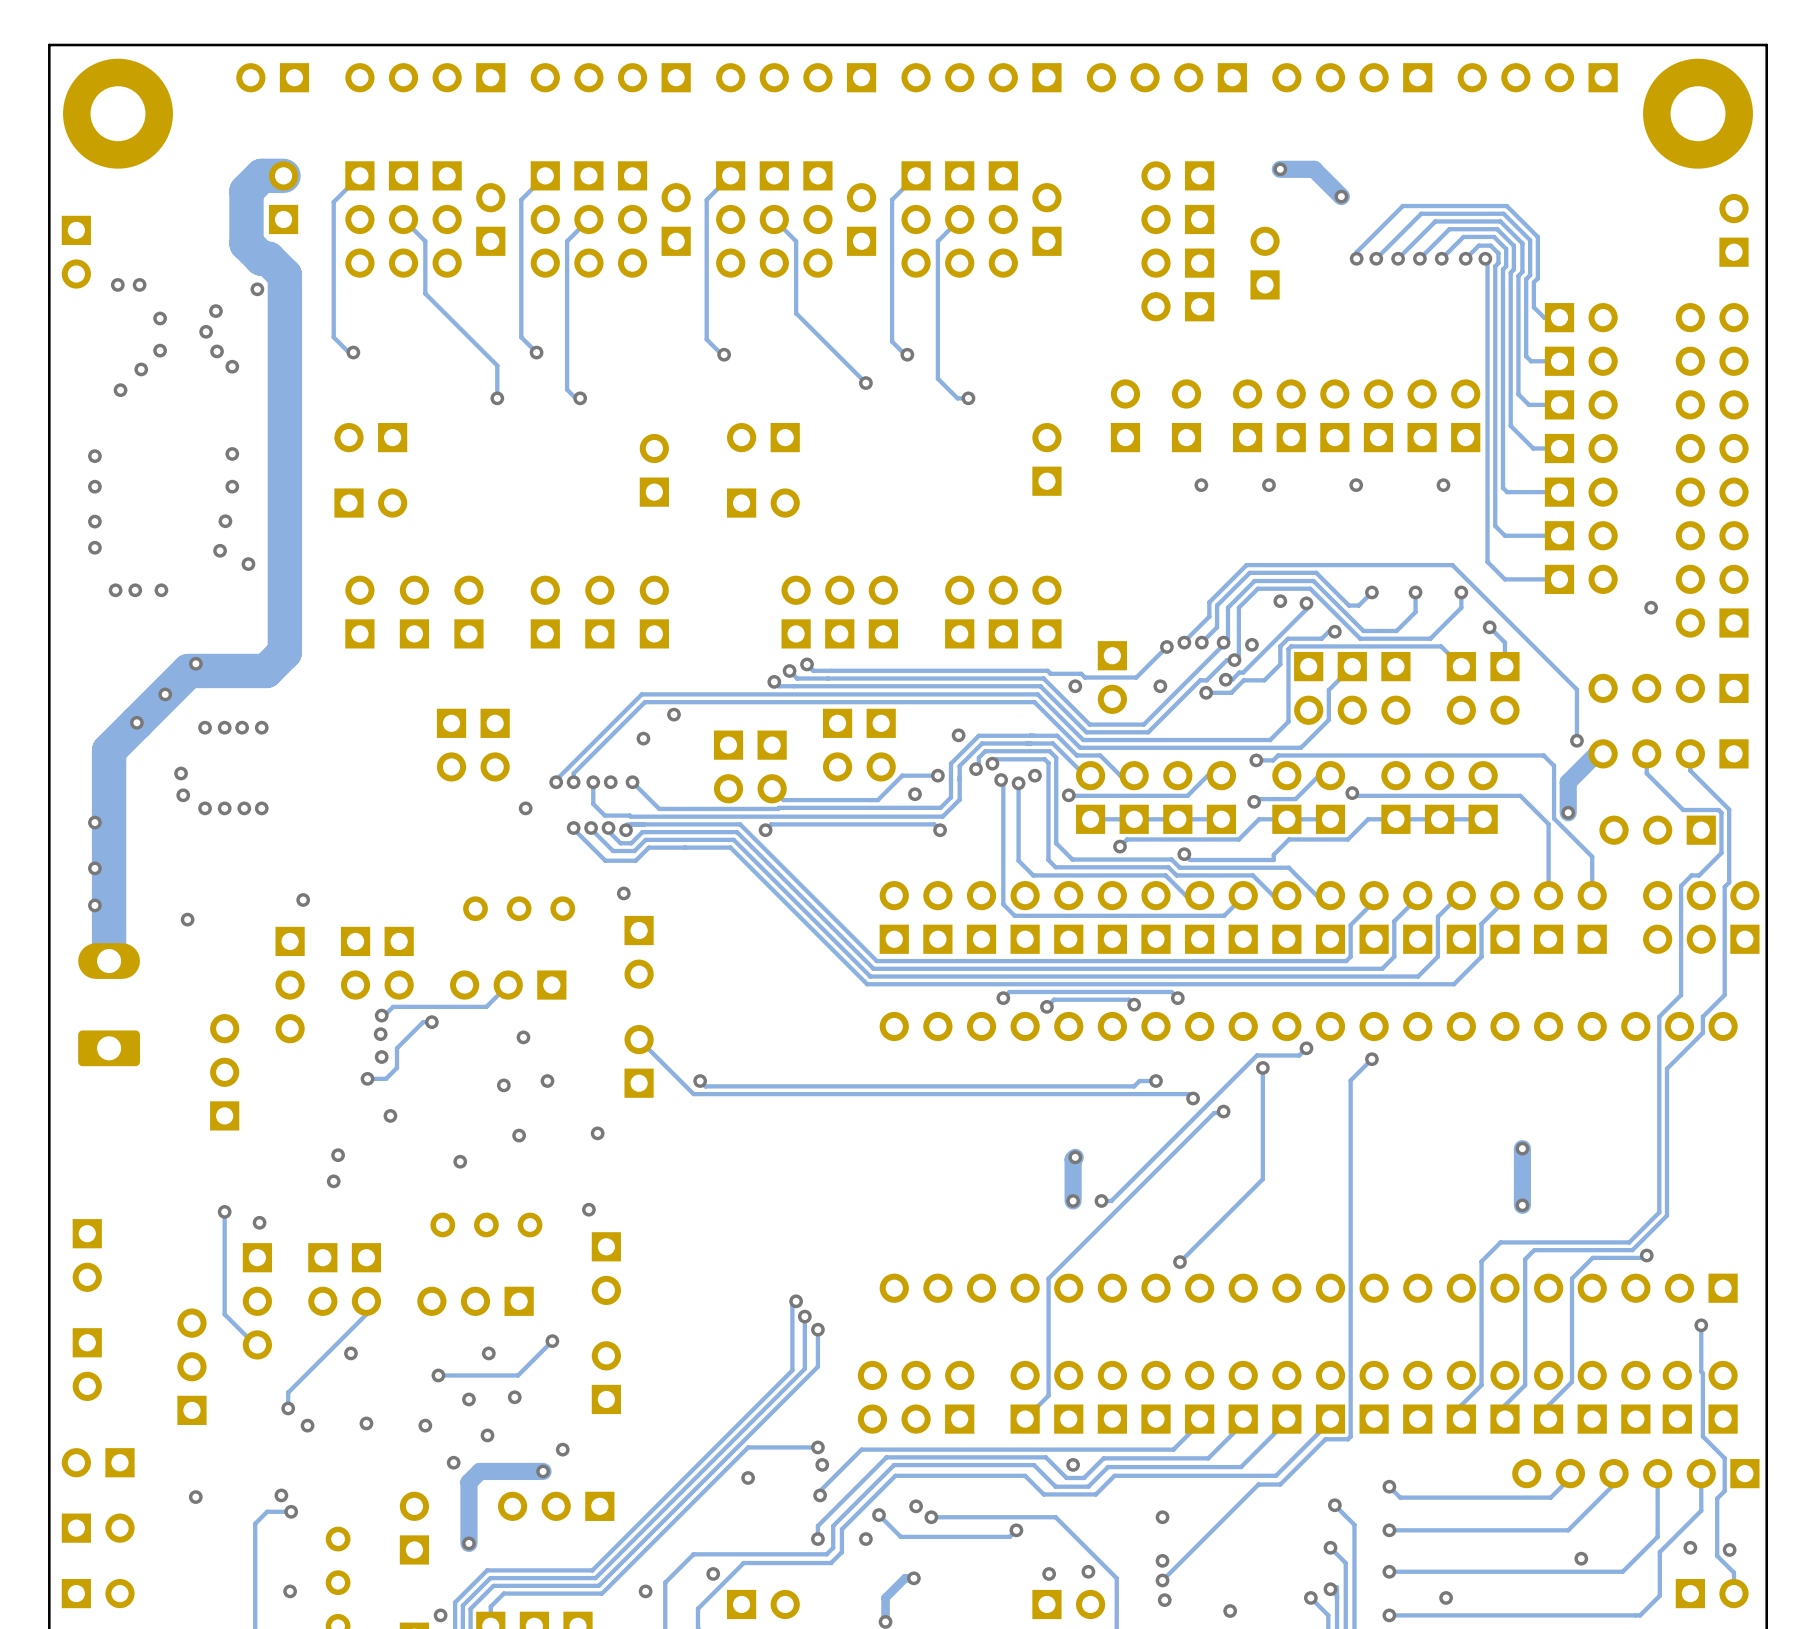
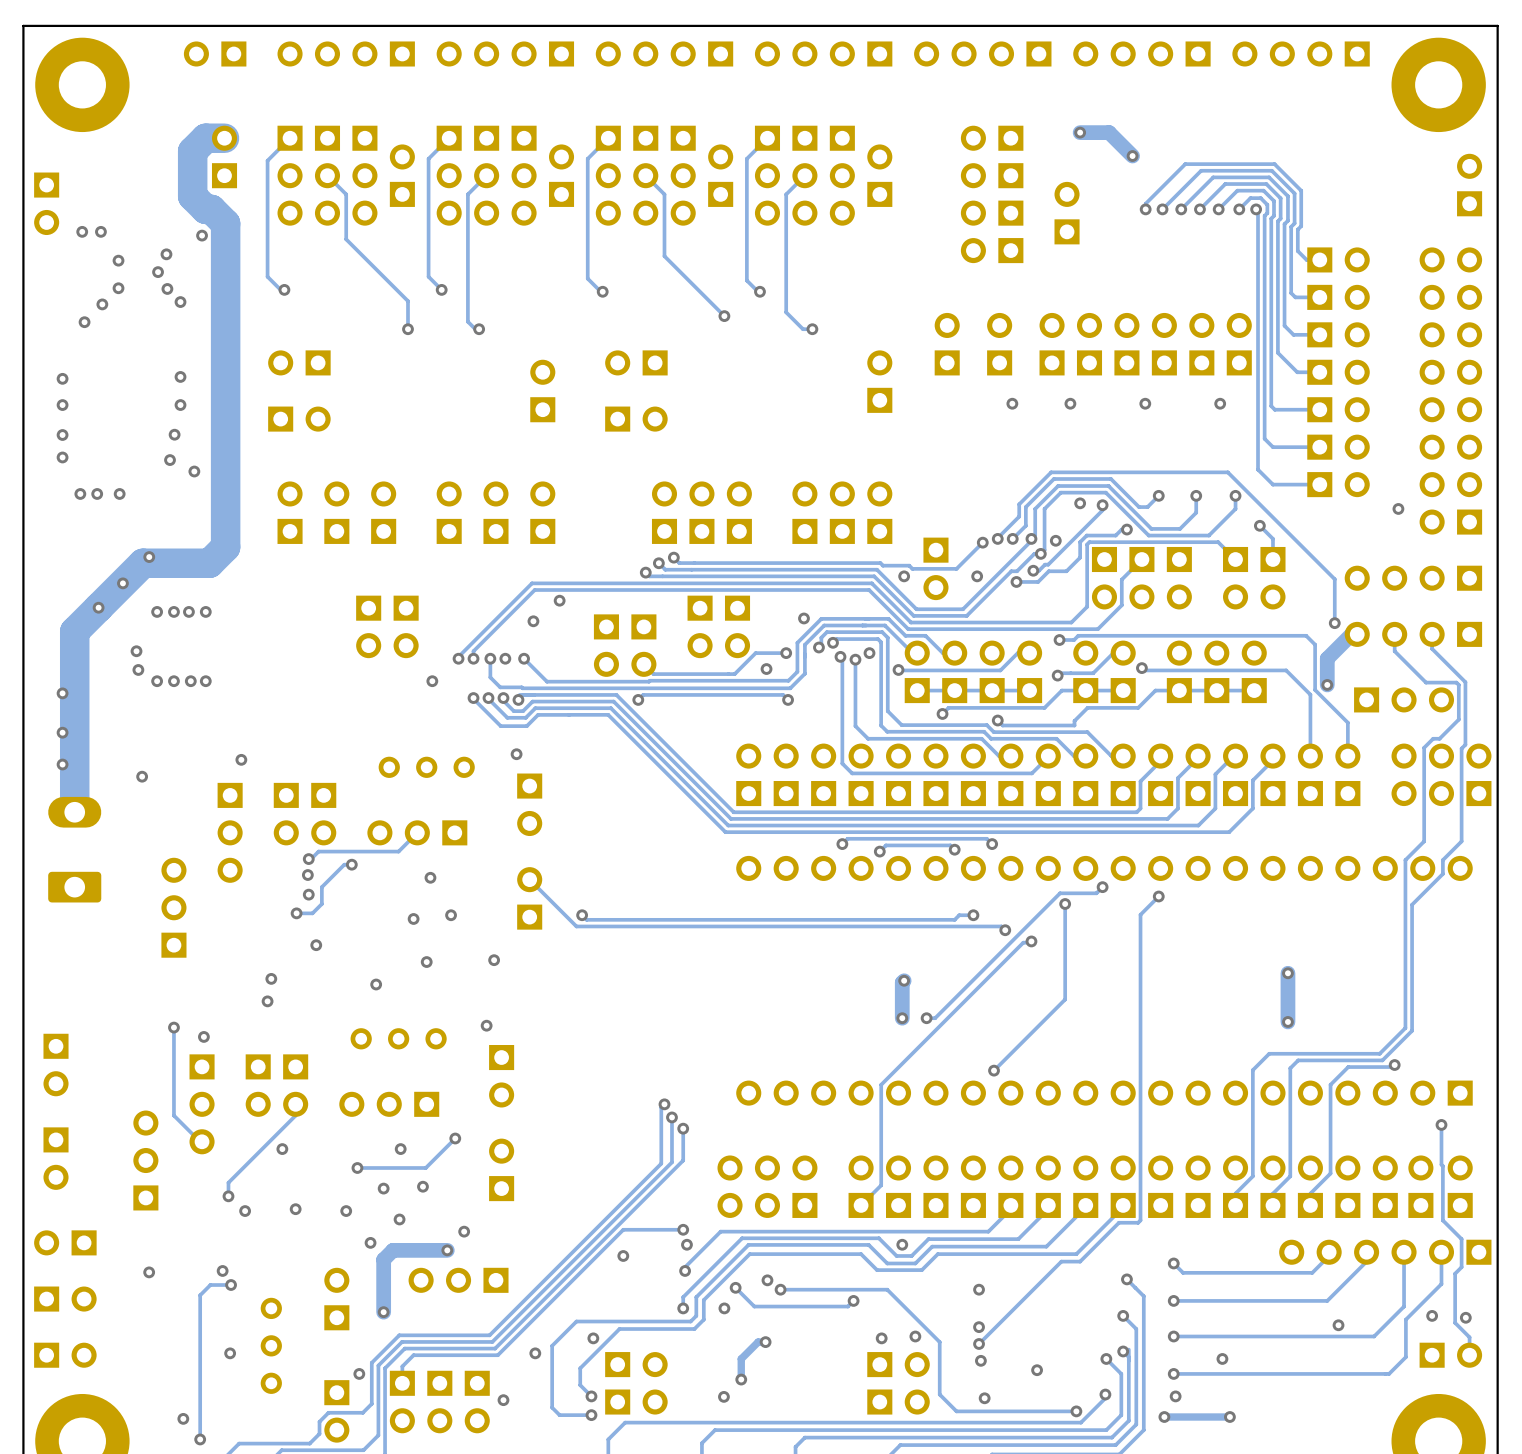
part rotation: 0° (1657, 830) -> 180° (1404, 699)

